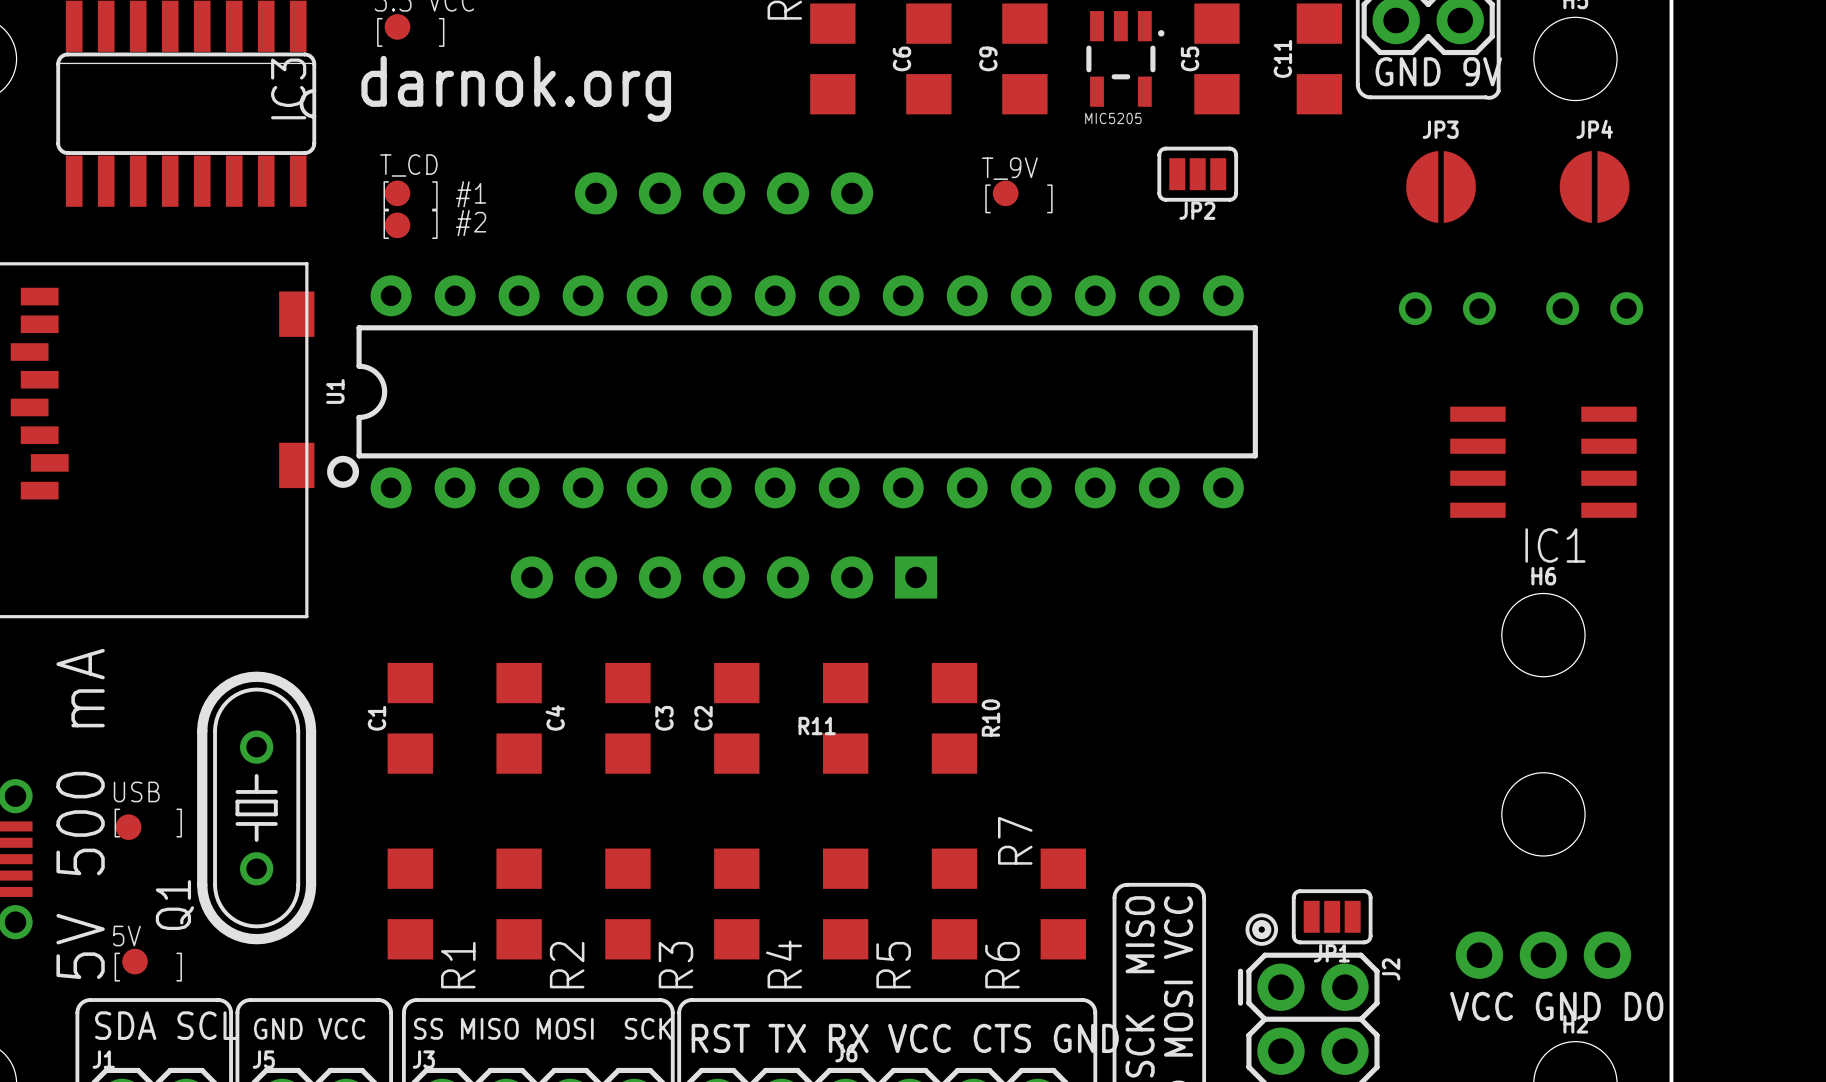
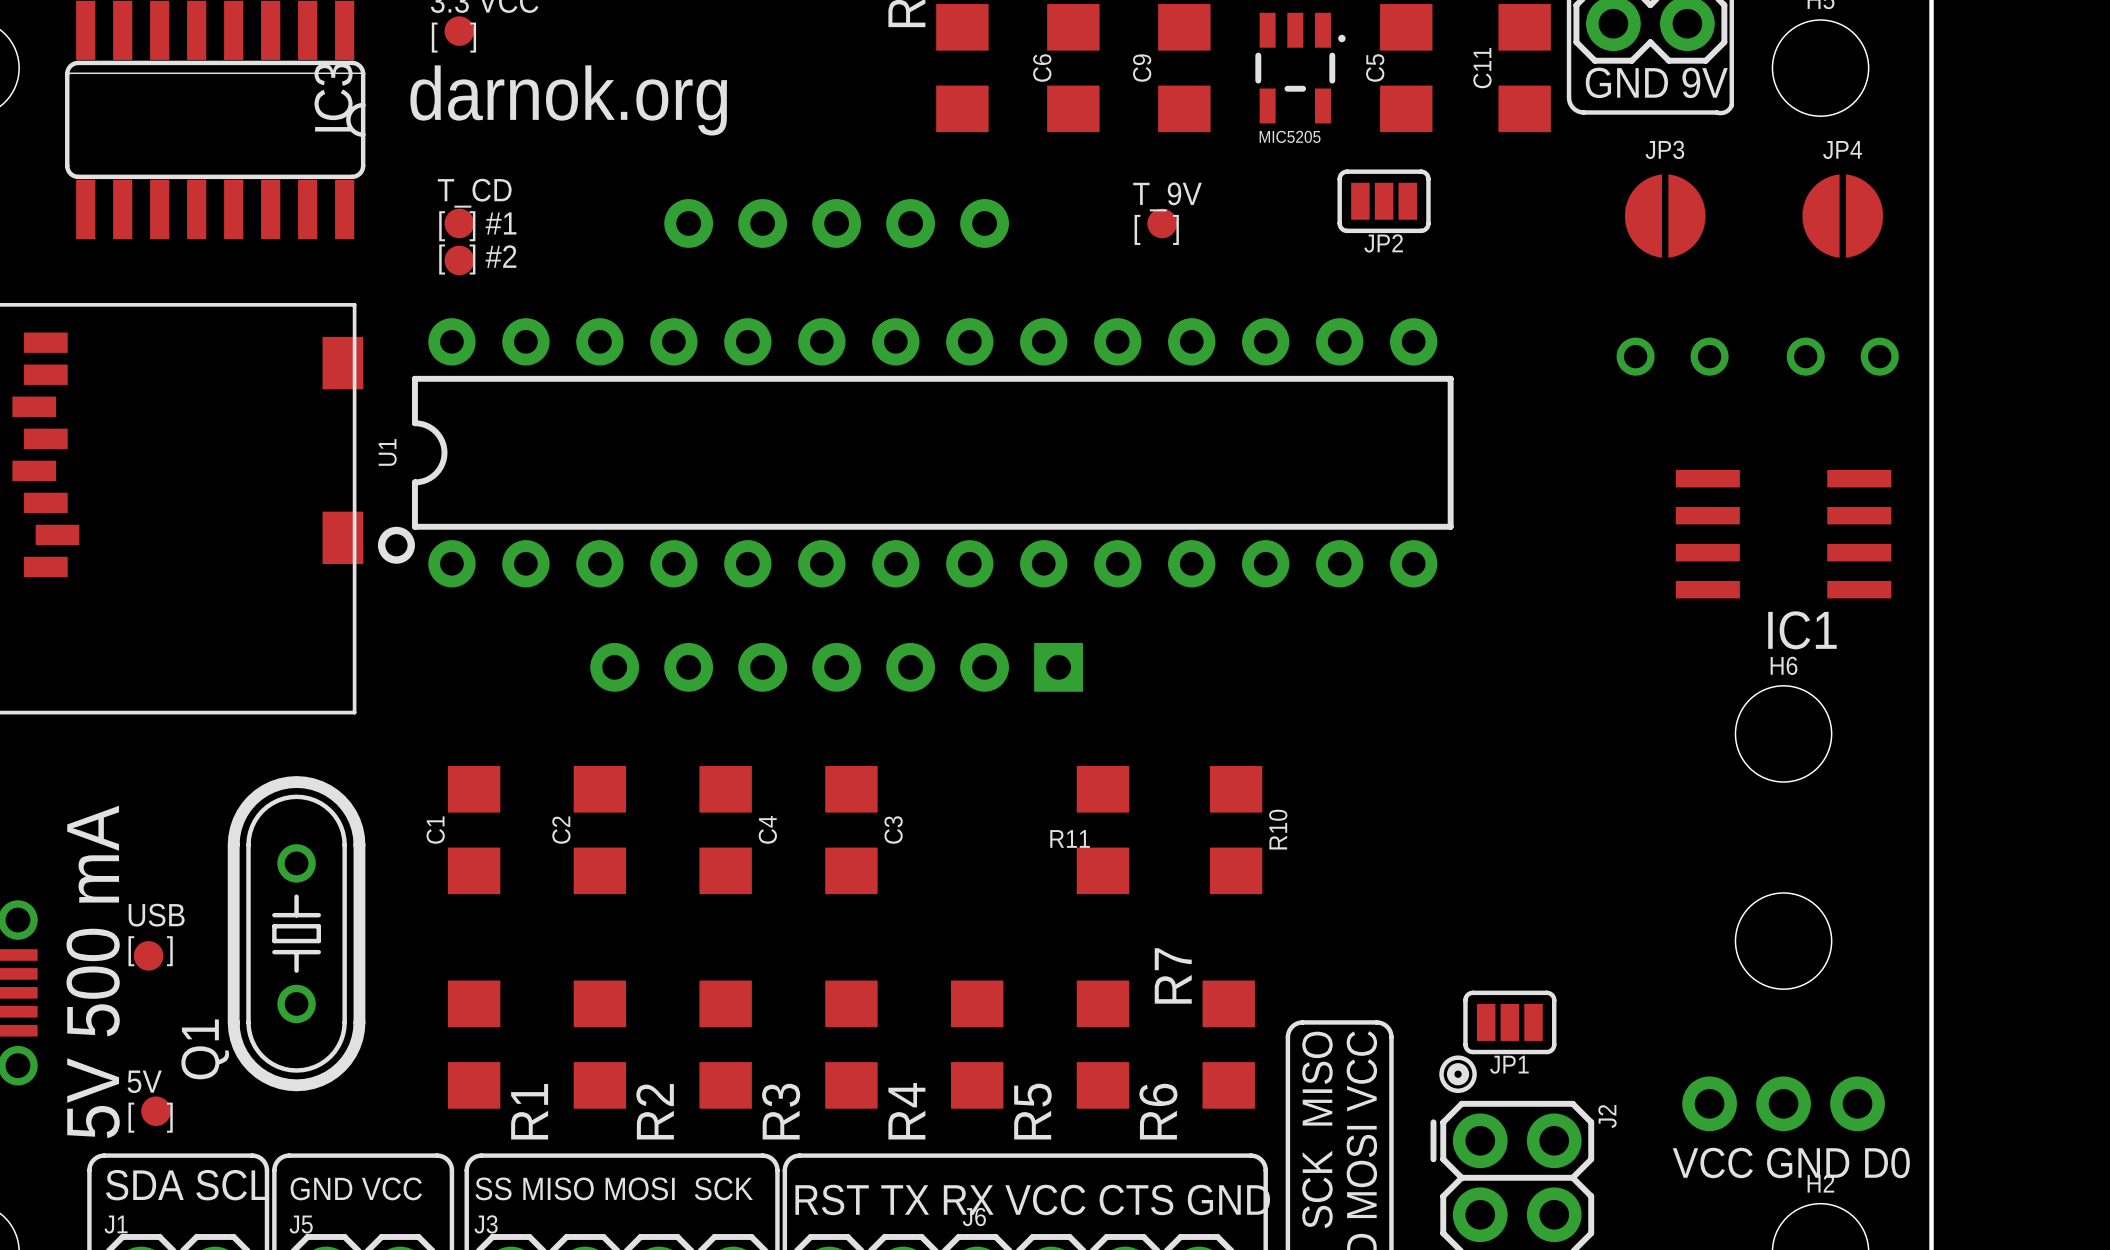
C4 name: C4 (555, 718) -> C2 (561, 830)
C3 name: C3 (664, 718) -> C4 (767, 829)
C2 name: C2 (703, 718) -> C3 (893, 830)
R11: (845, 718) -> none
R10 name: R10 (990, 718) -> R11 (1070, 838)
R10: none -> (1236, 830)
JP1 position: (1332, 916) -> (1509, 1022)

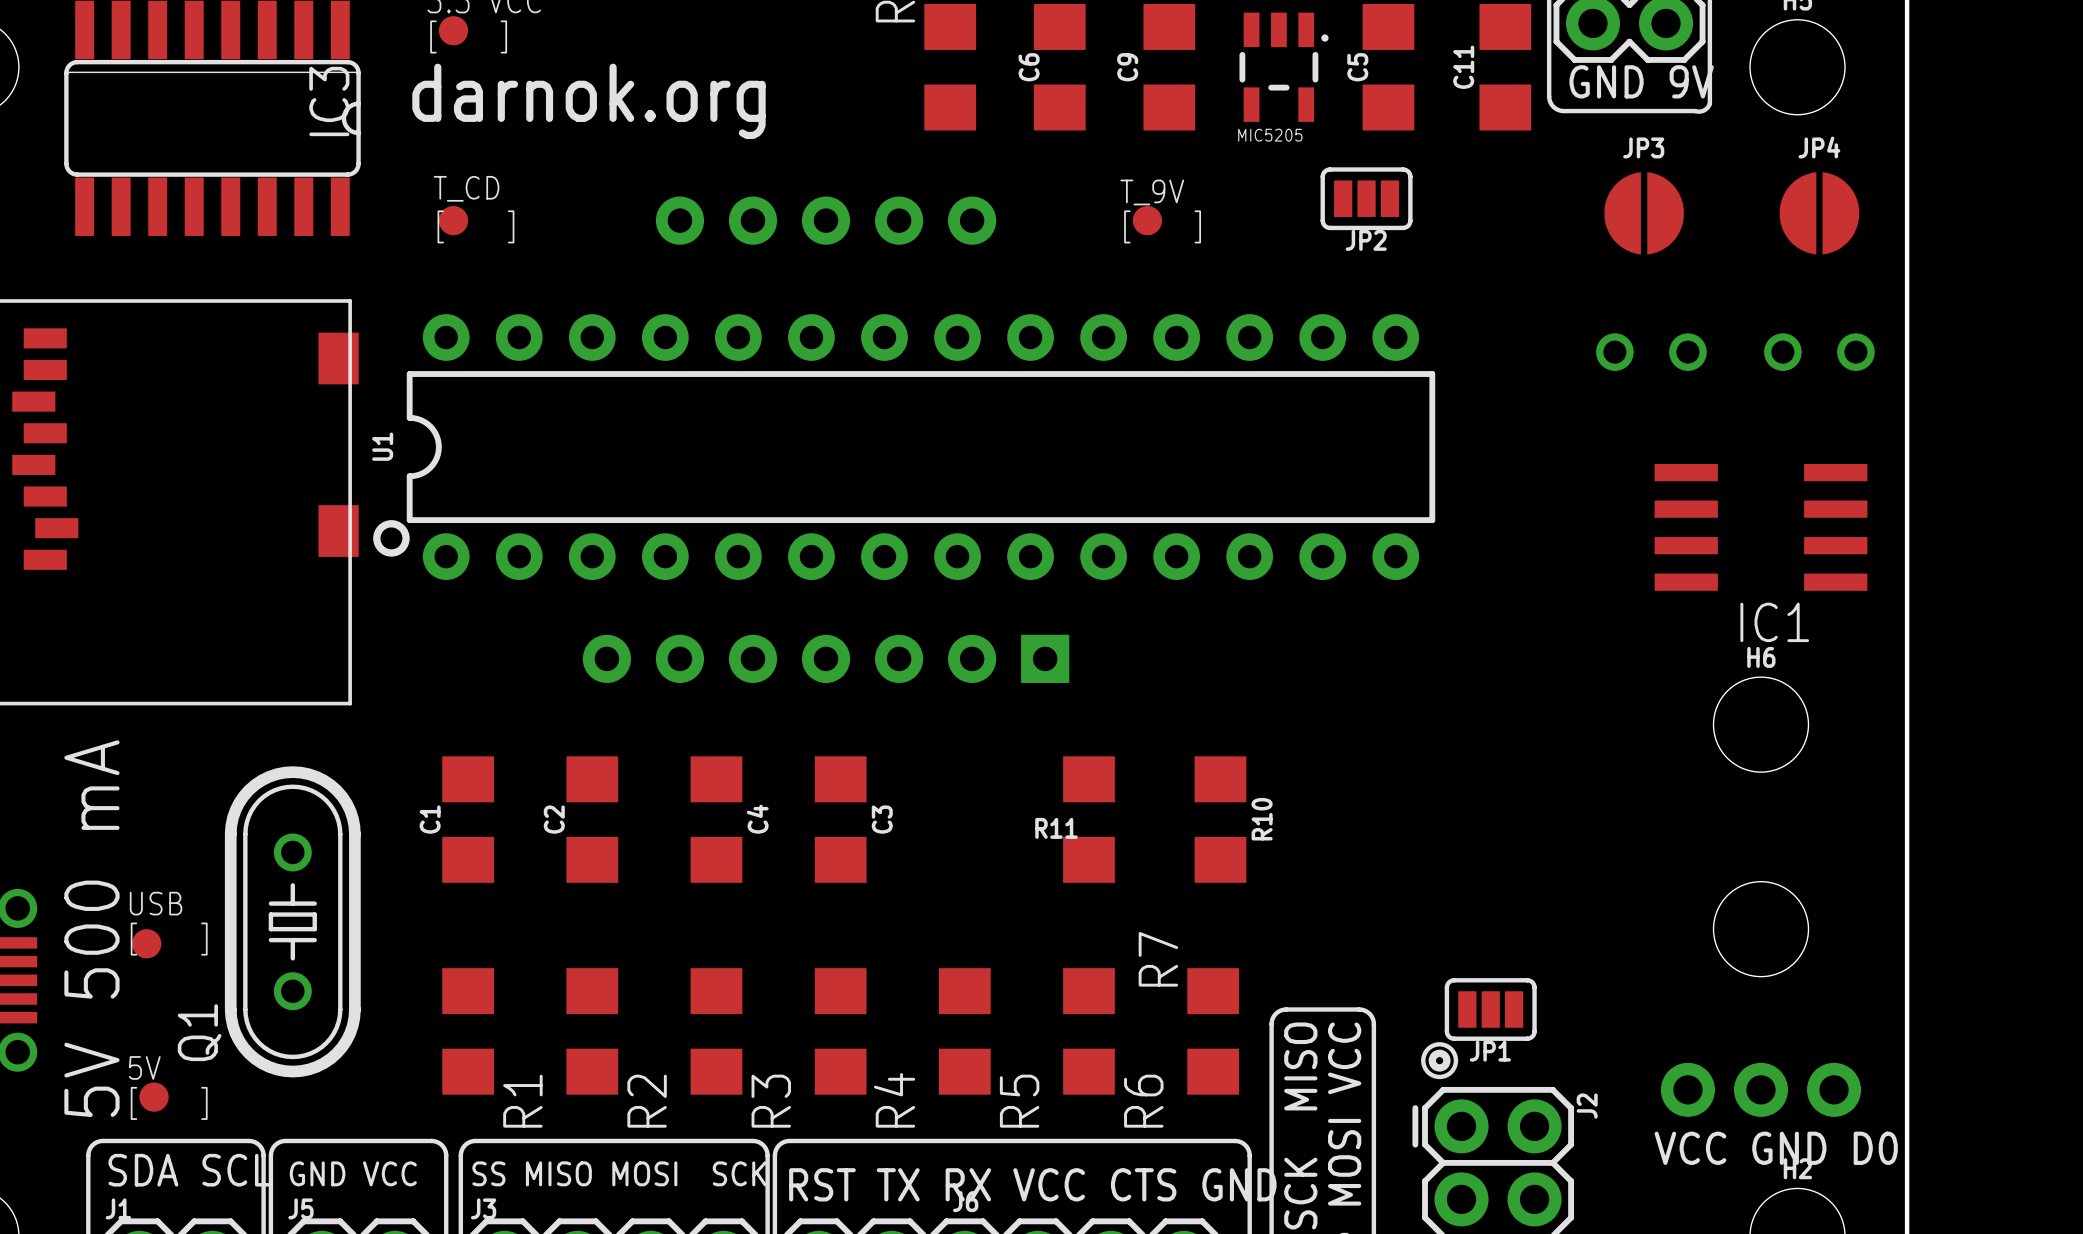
text: [ ] #1 (477, 226) -> [ ] (475, 226)
text: [ ] #2 (477, 259) -> none
part: (459, 260) -> none

